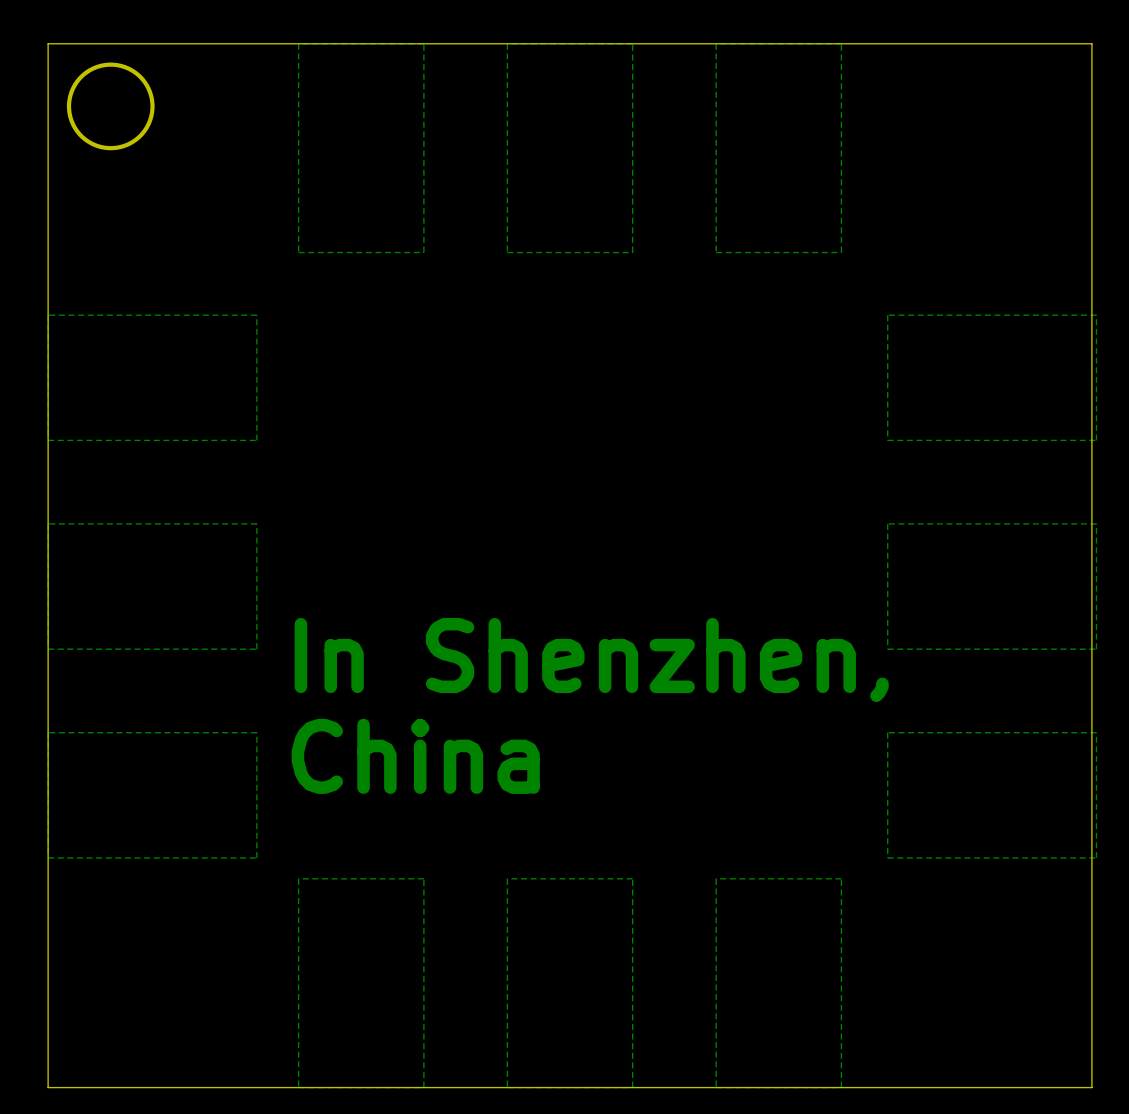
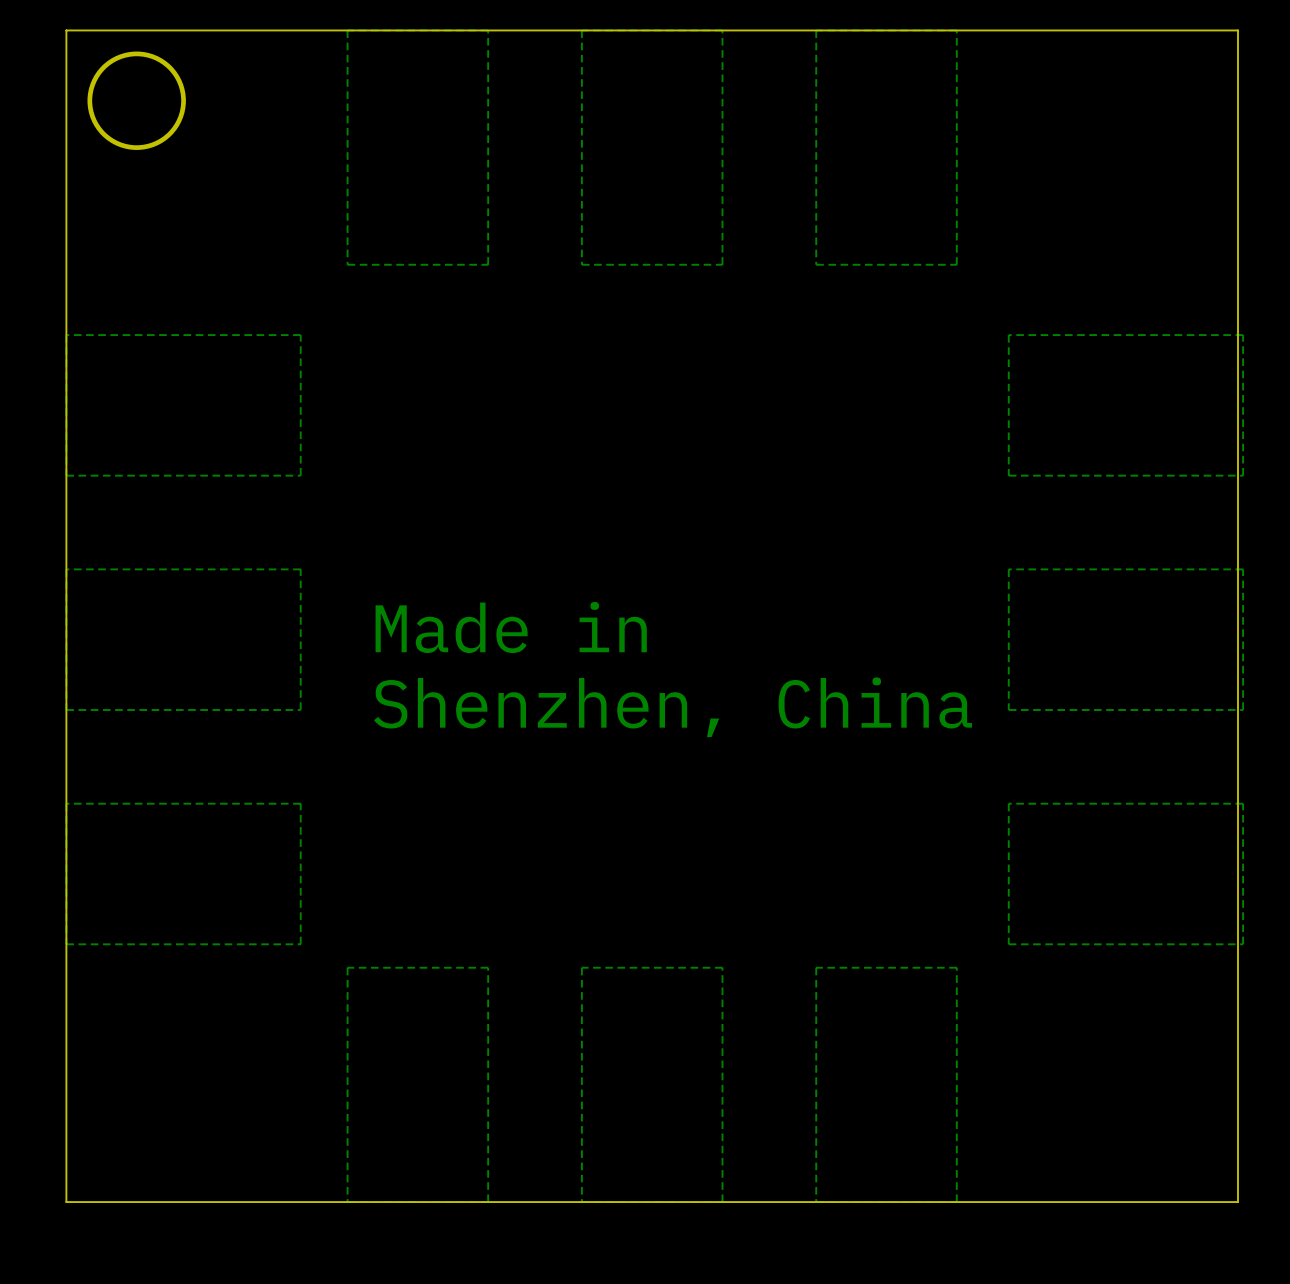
text: none -> Made in (511, 627)
text: In Shenzhen, (591, 659) -> Shenzhen, China (672, 707)
text: China (415, 756) -> none

